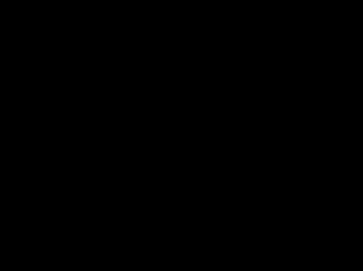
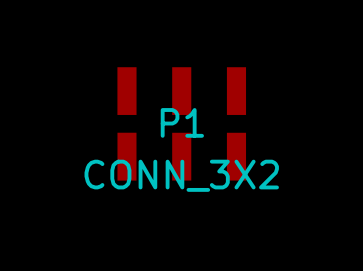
P1: none -> CONN_3X2 (181, 123)

